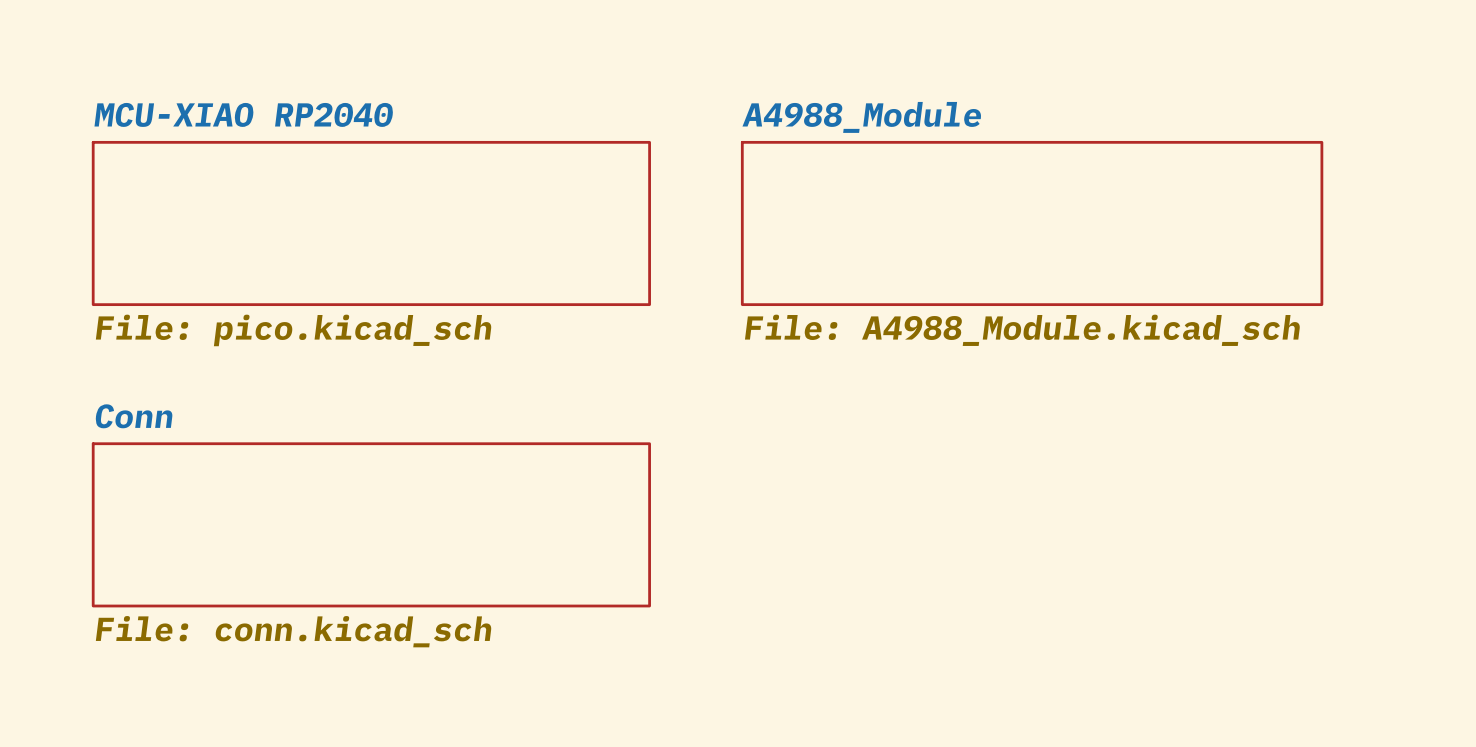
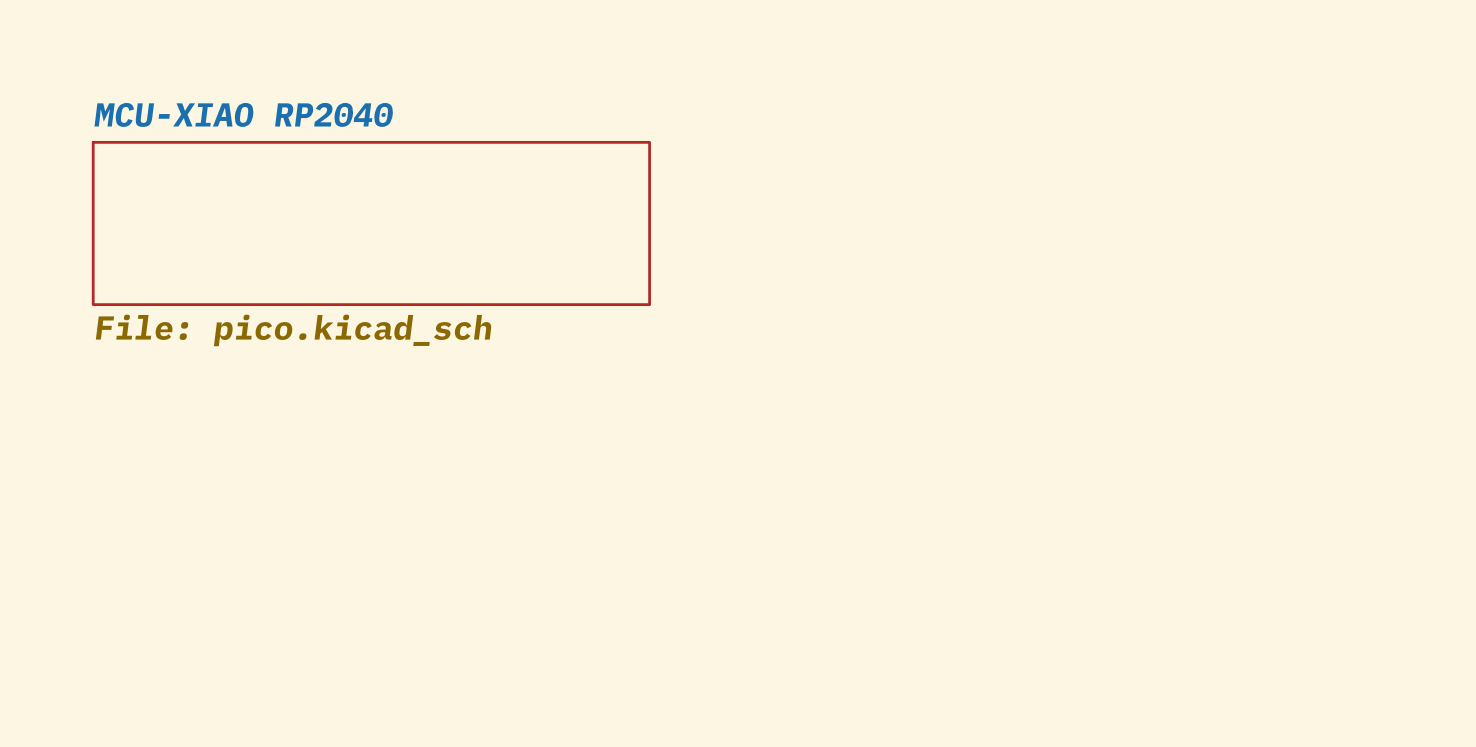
sheet A4988_Module: File: A4988_Module.kicad_sch (1032, 223) -> none
sheet Conn: File: conn.kicad_sch (371, 524) -> none

